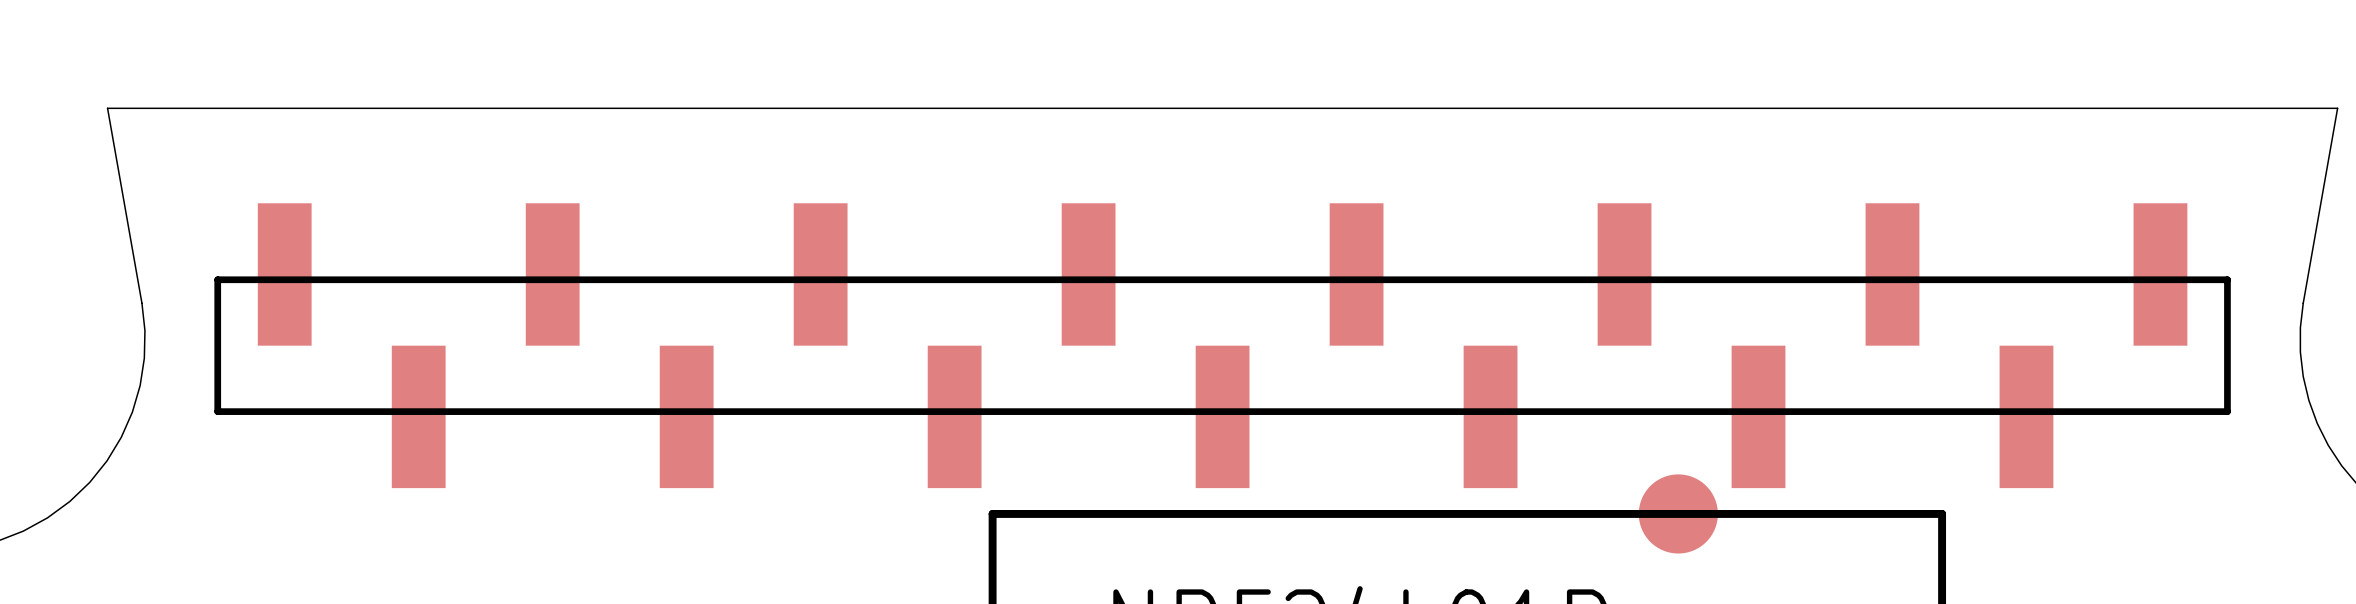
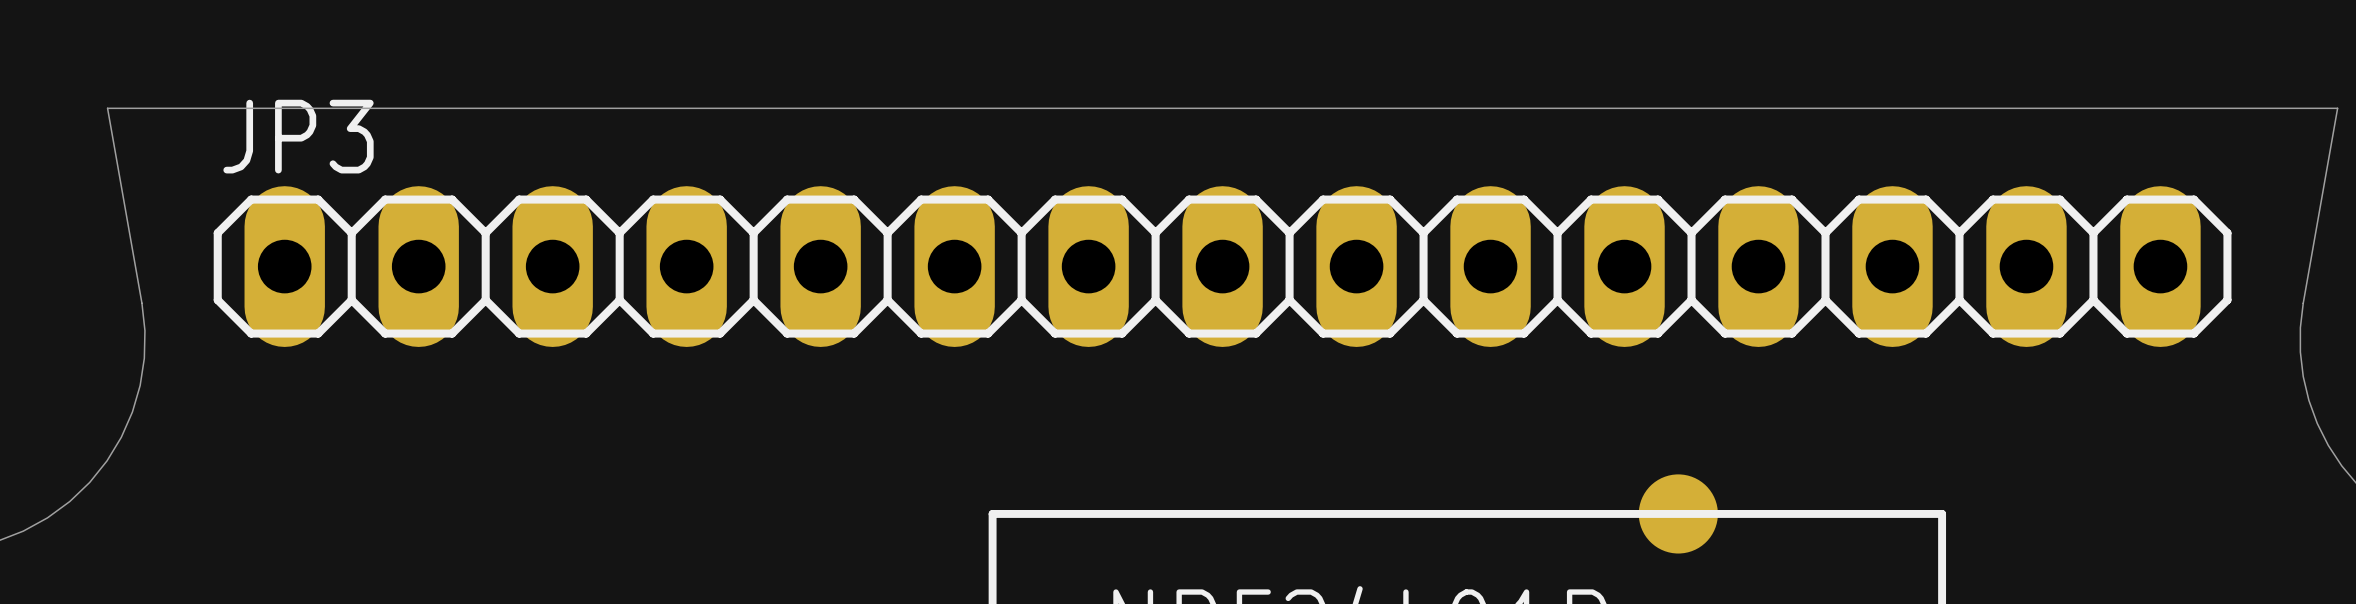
JP3: none -> (1222, 266)
part: (1222, 345) -> none

